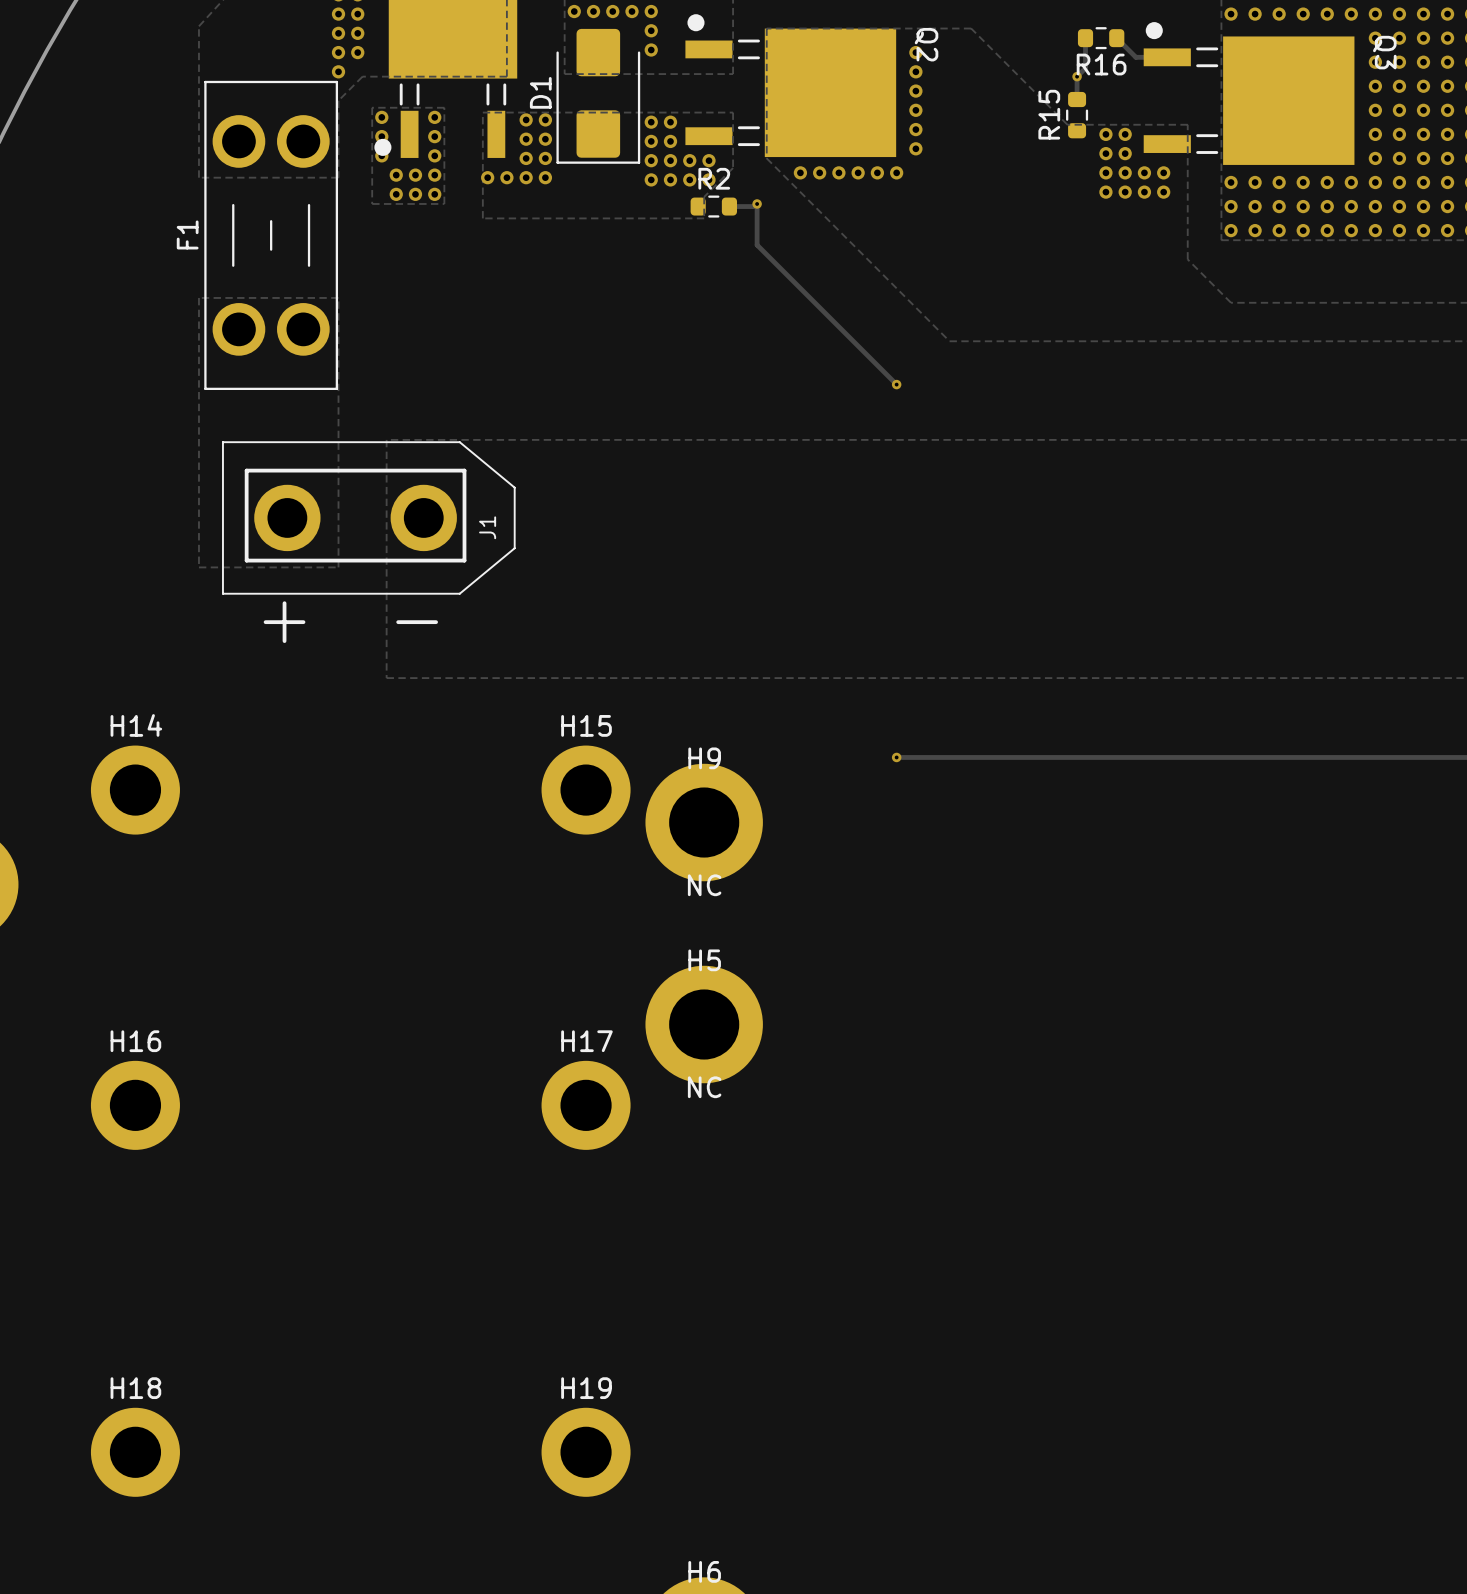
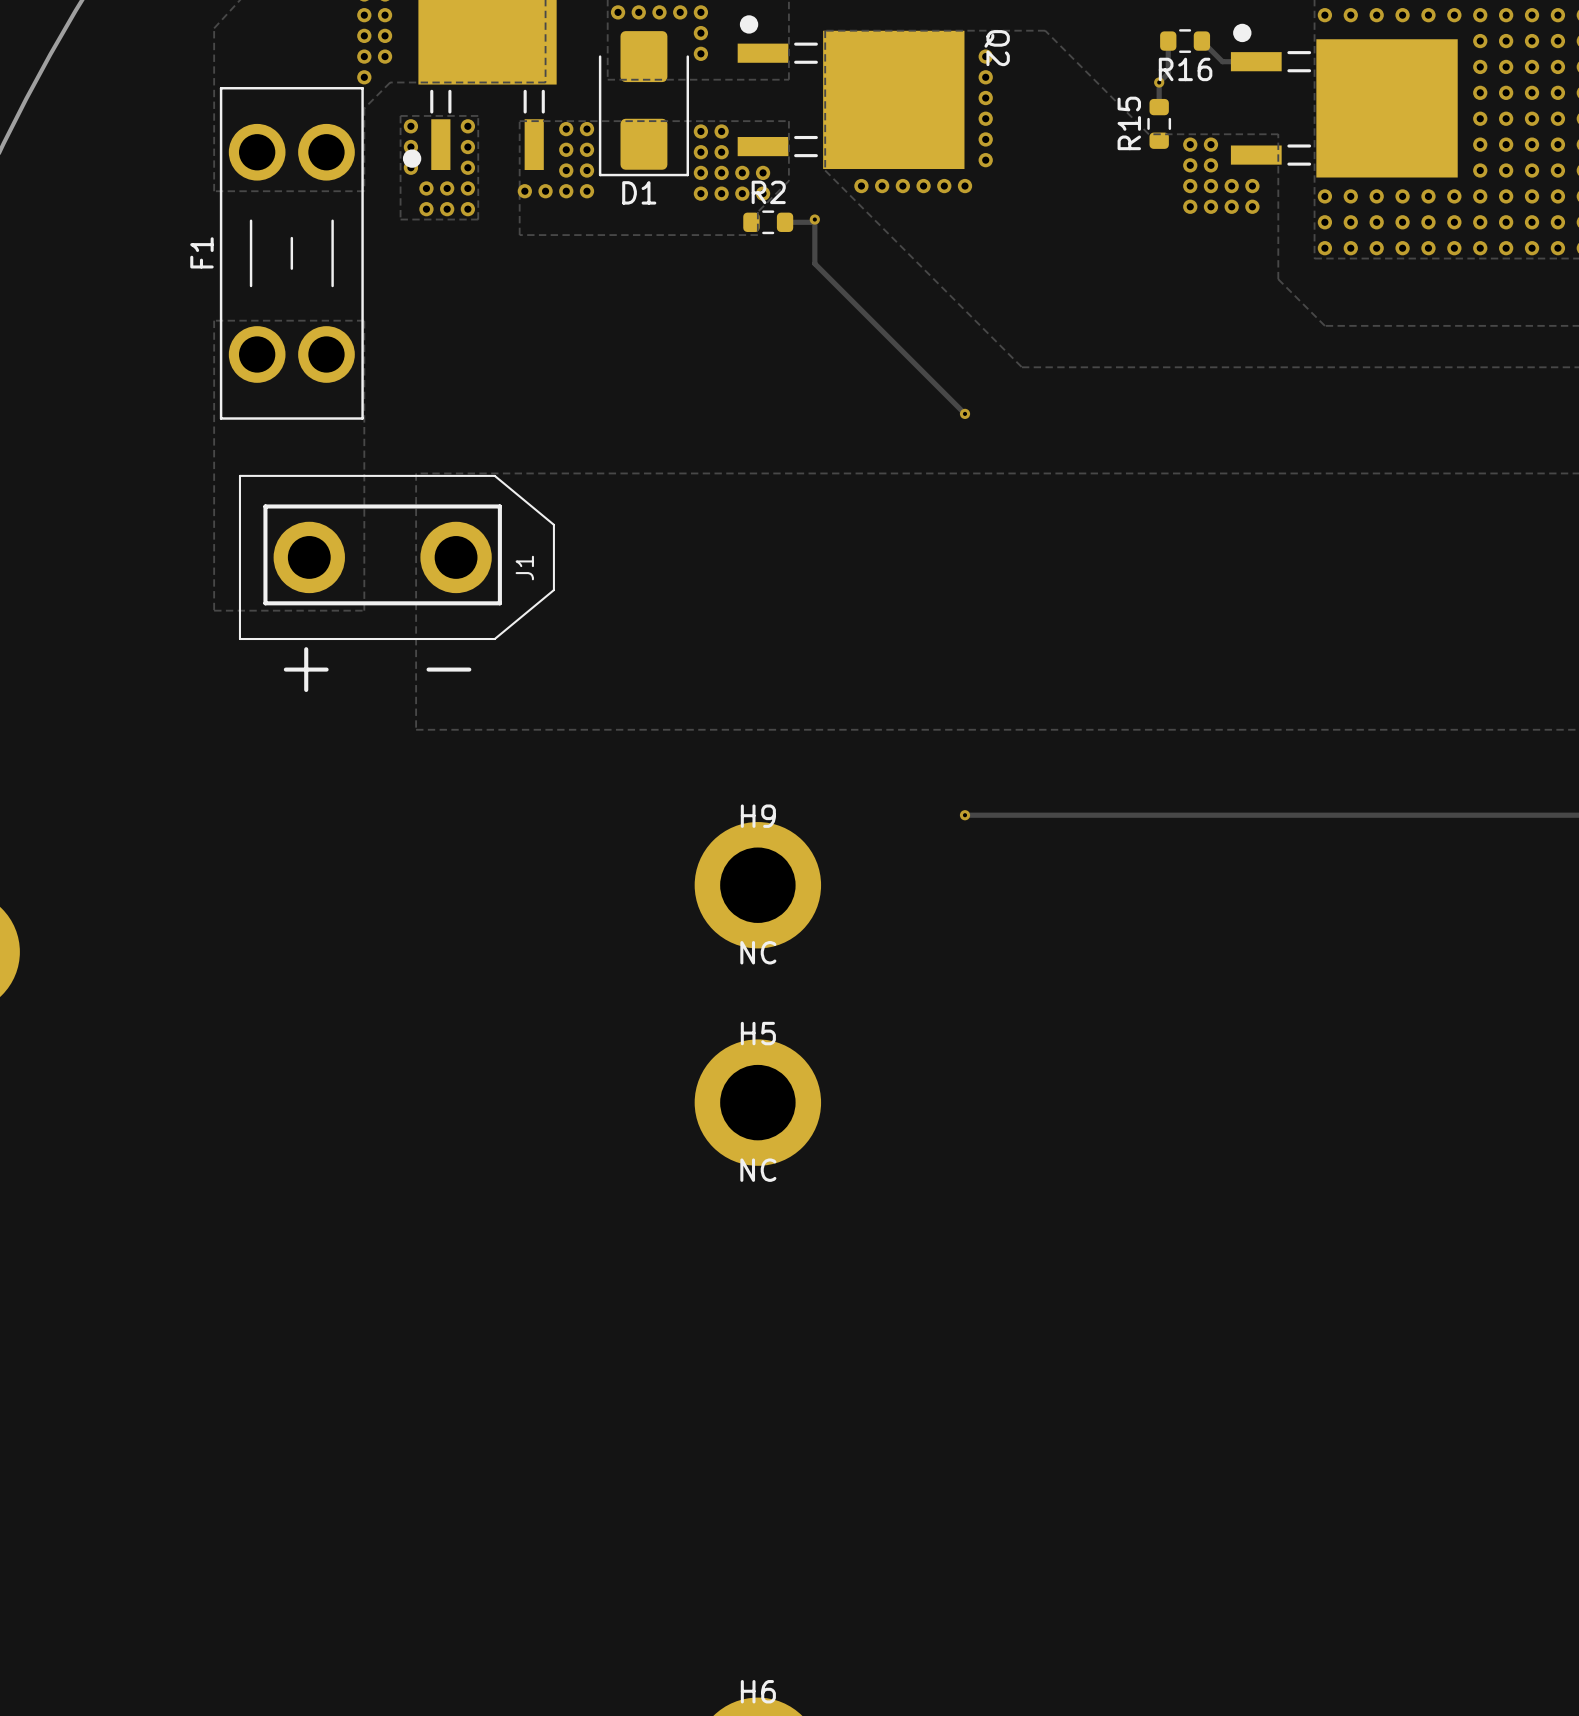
Q3 name: Q3 (1384, 52) -> none
D1 name rotation: 0° (540, 92) -> 90° clockwise (639, 192)
D1 name position: D1 (540, 92) -> D1 (639, 192)
H14: (135, 790) -> none
H15: (586, 790) -> none
H16: (135, 1105) -> none
H17: (586, 1105) -> none
H18: (135, 1452) -> none
H19: (586, 1452) -> none

